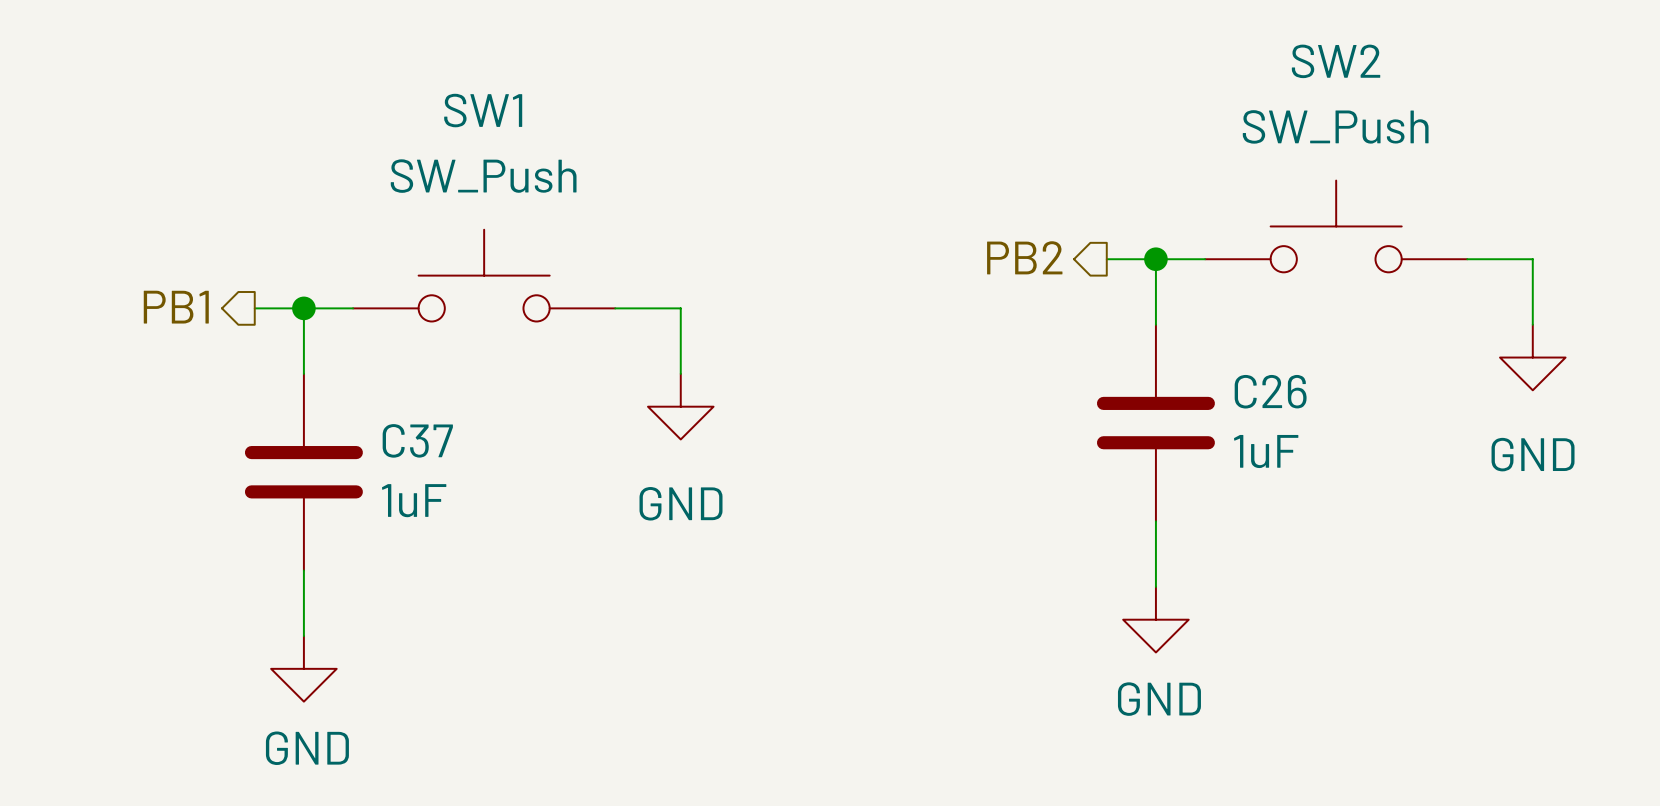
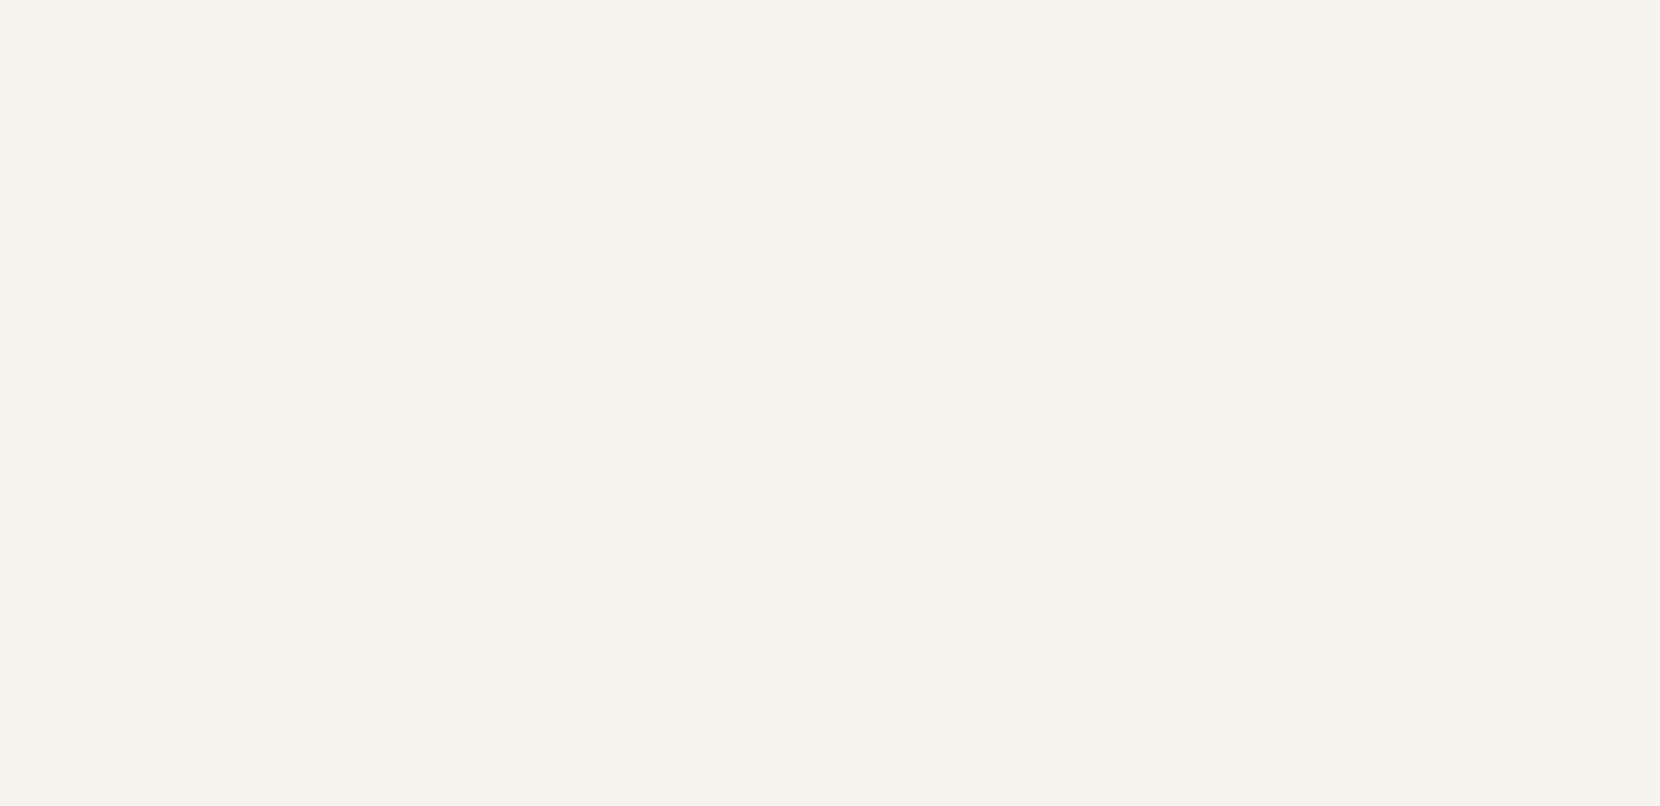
SW2: SW_Push (1336, 226) -> none
hierarchical label: PB2 (1024, 257) -> none
wire: (1106, 259) (1205, 259) -> none
wire: (1155, 259) (1155, 324) -> none
junction: (1155, 259) -> none
wire: (1467, 259) (1532, 259) (1532, 324) -> none
SW1: SW_Push (484, 275) -> none
hierarchical label: PB1 (176, 307) -> none
wire: (254, 308) (353, 308) -> none
wire: (303, 308) (303, 373) -> none
junction: (303, 308) -> none
wire: (615, 308) (680, 308) (680, 373) -> none
power symbol: GND (1532, 357) -> none
power symbol: GND (680, 406) -> none
C26: 1uF (1155, 423) -> none
C37: 1uF (303, 472) -> none
wire: (1155, 521) (1155, 586) -> none
wire: (303, 570) (303, 636) -> none
power symbol: GND (1155, 619) -> none
power symbol: GND (303, 668) -> none

